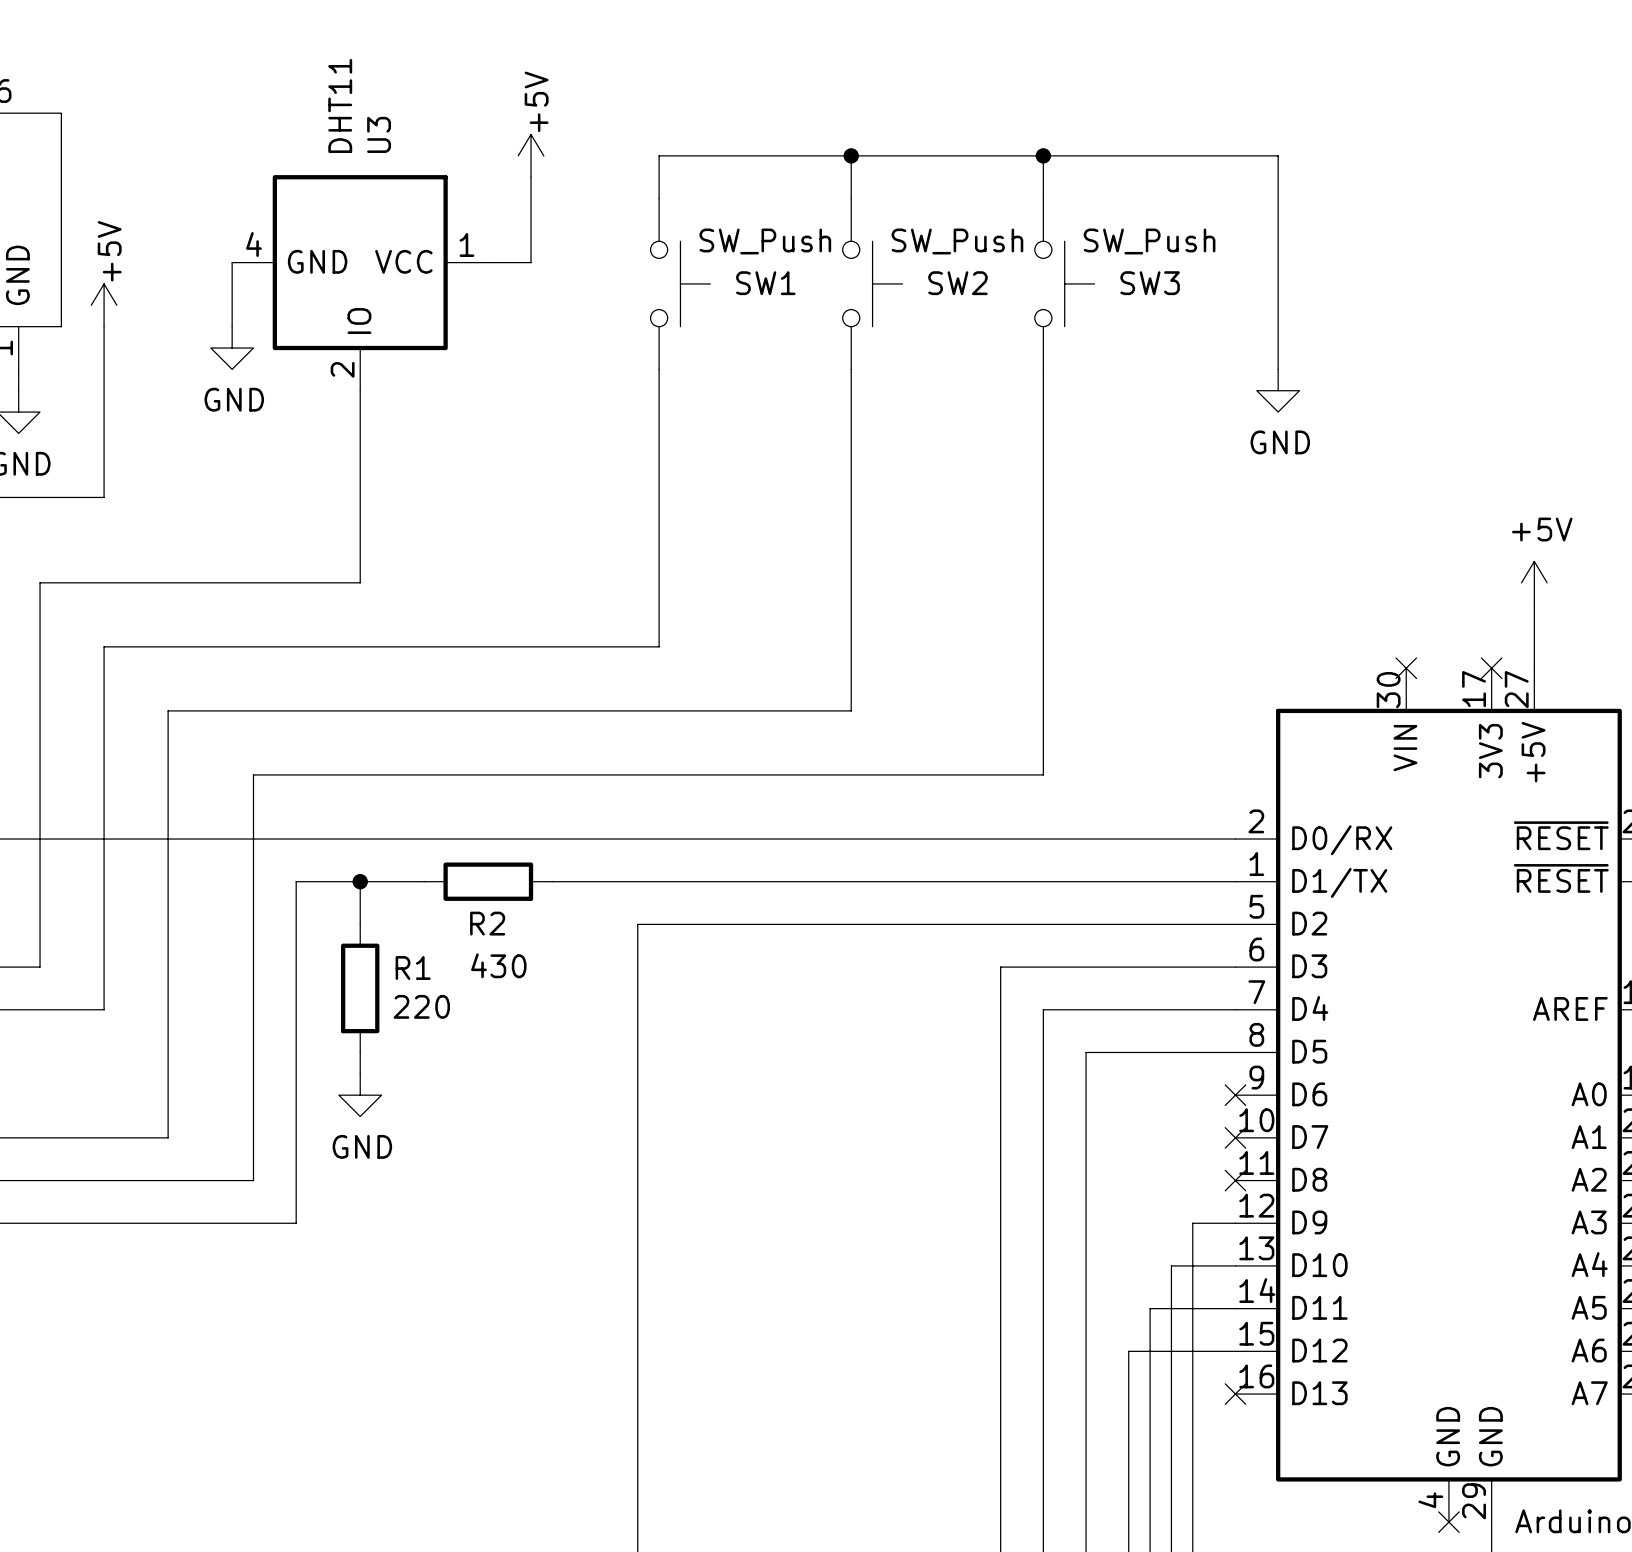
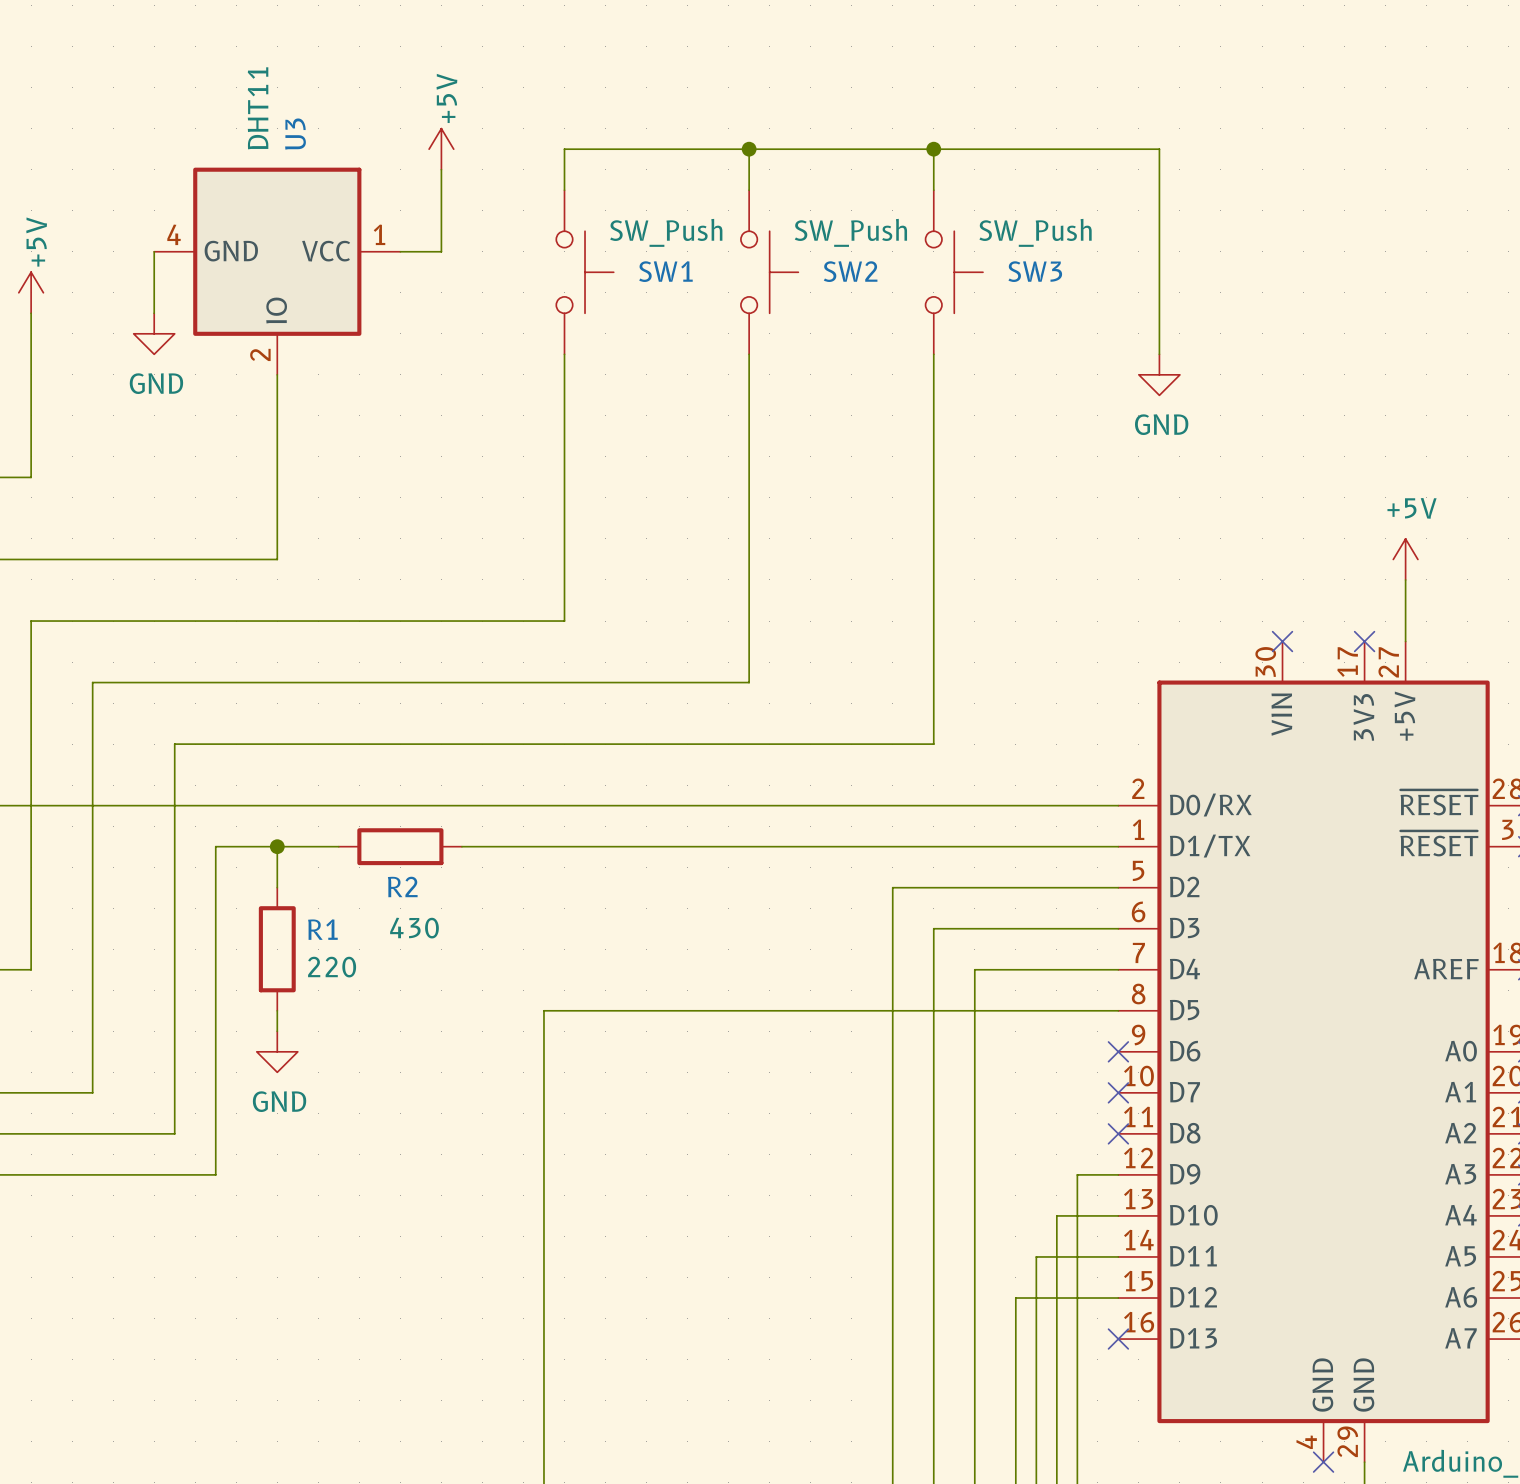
wire: (1000, 924) (637, 924) (637, 1052) -> (974, 969) (974, 1010) (543, 1010)
wire: (1000, 967) (1043, 967) -> (892, 928) (892, 887)
wire: (1043, 1009) (1086, 1009) -> (933, 969) (933, 928)

